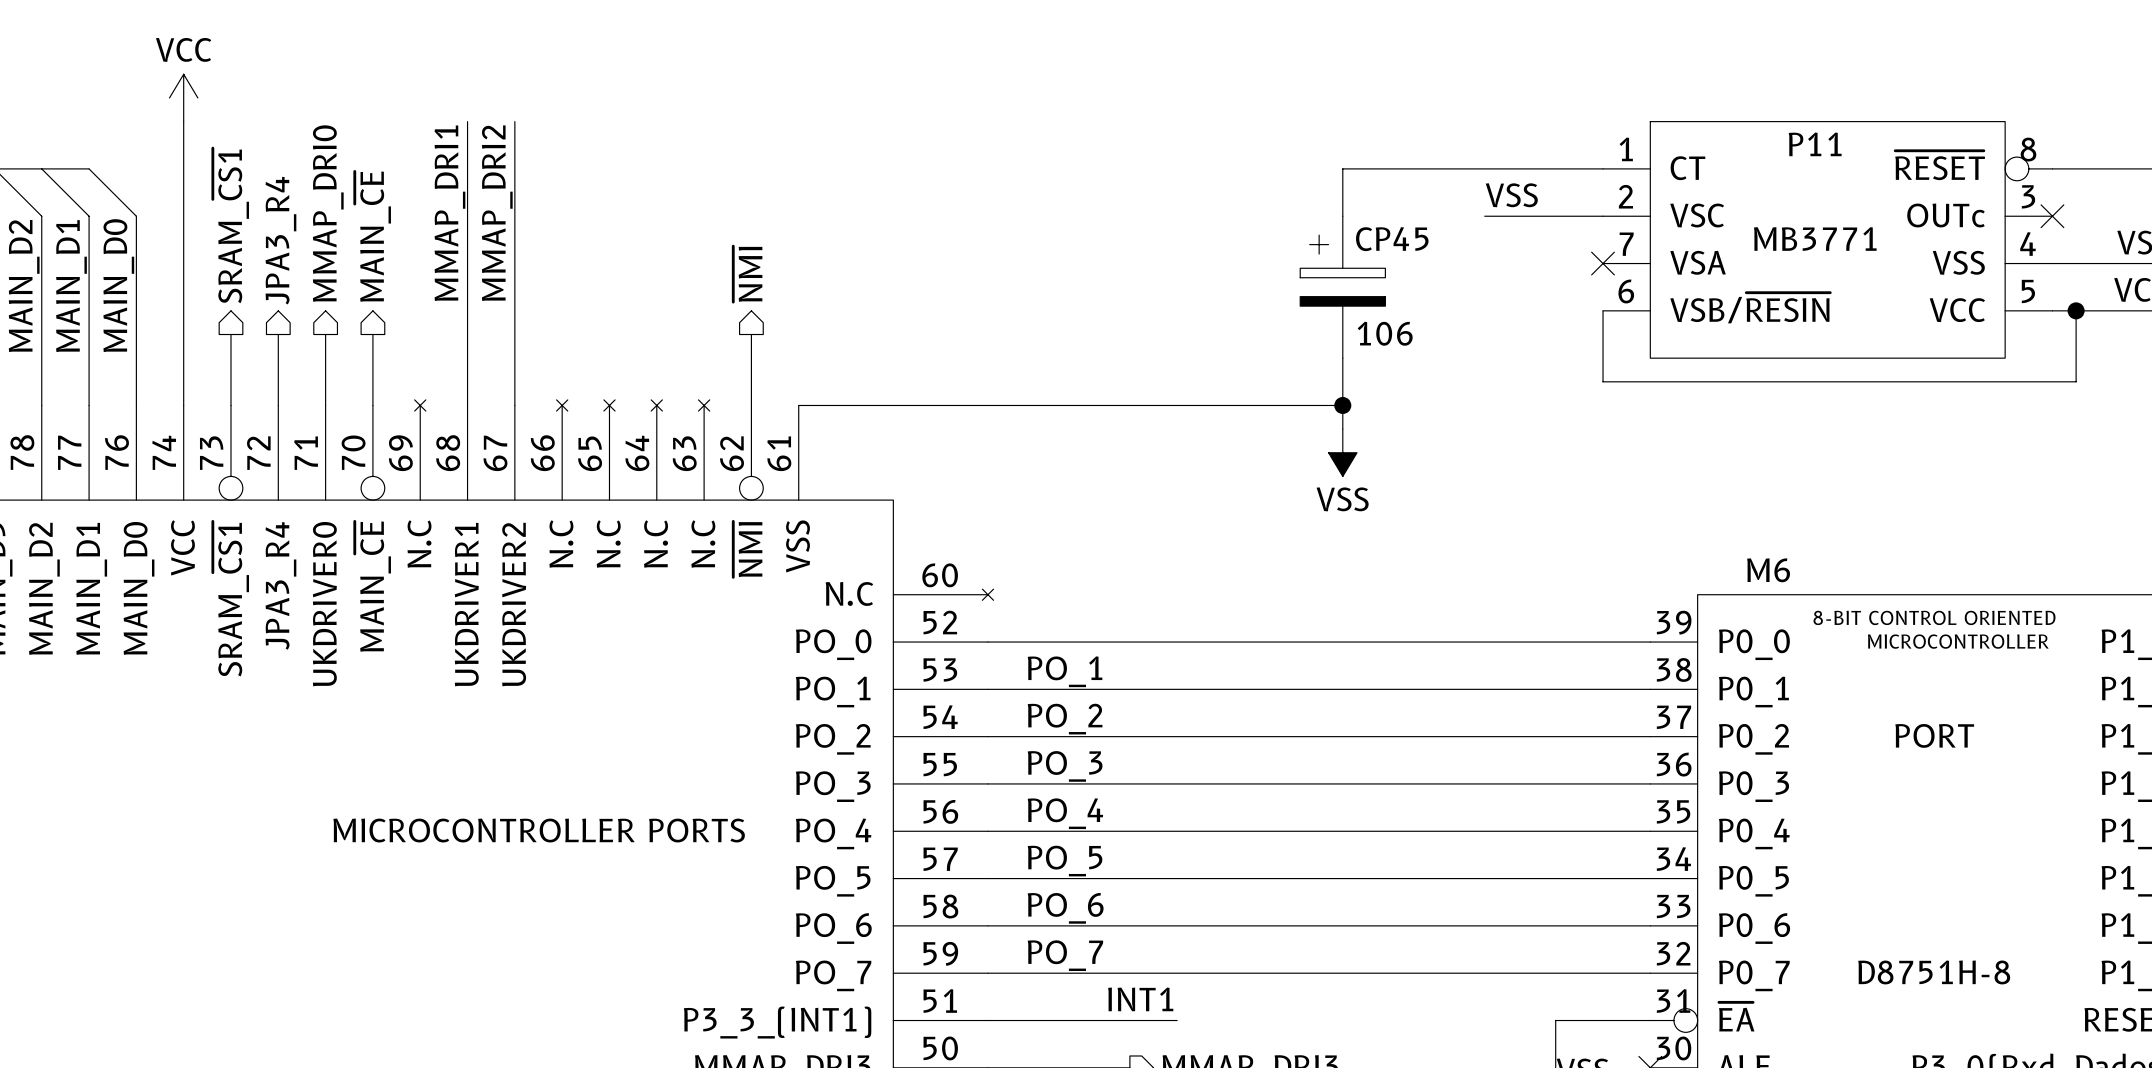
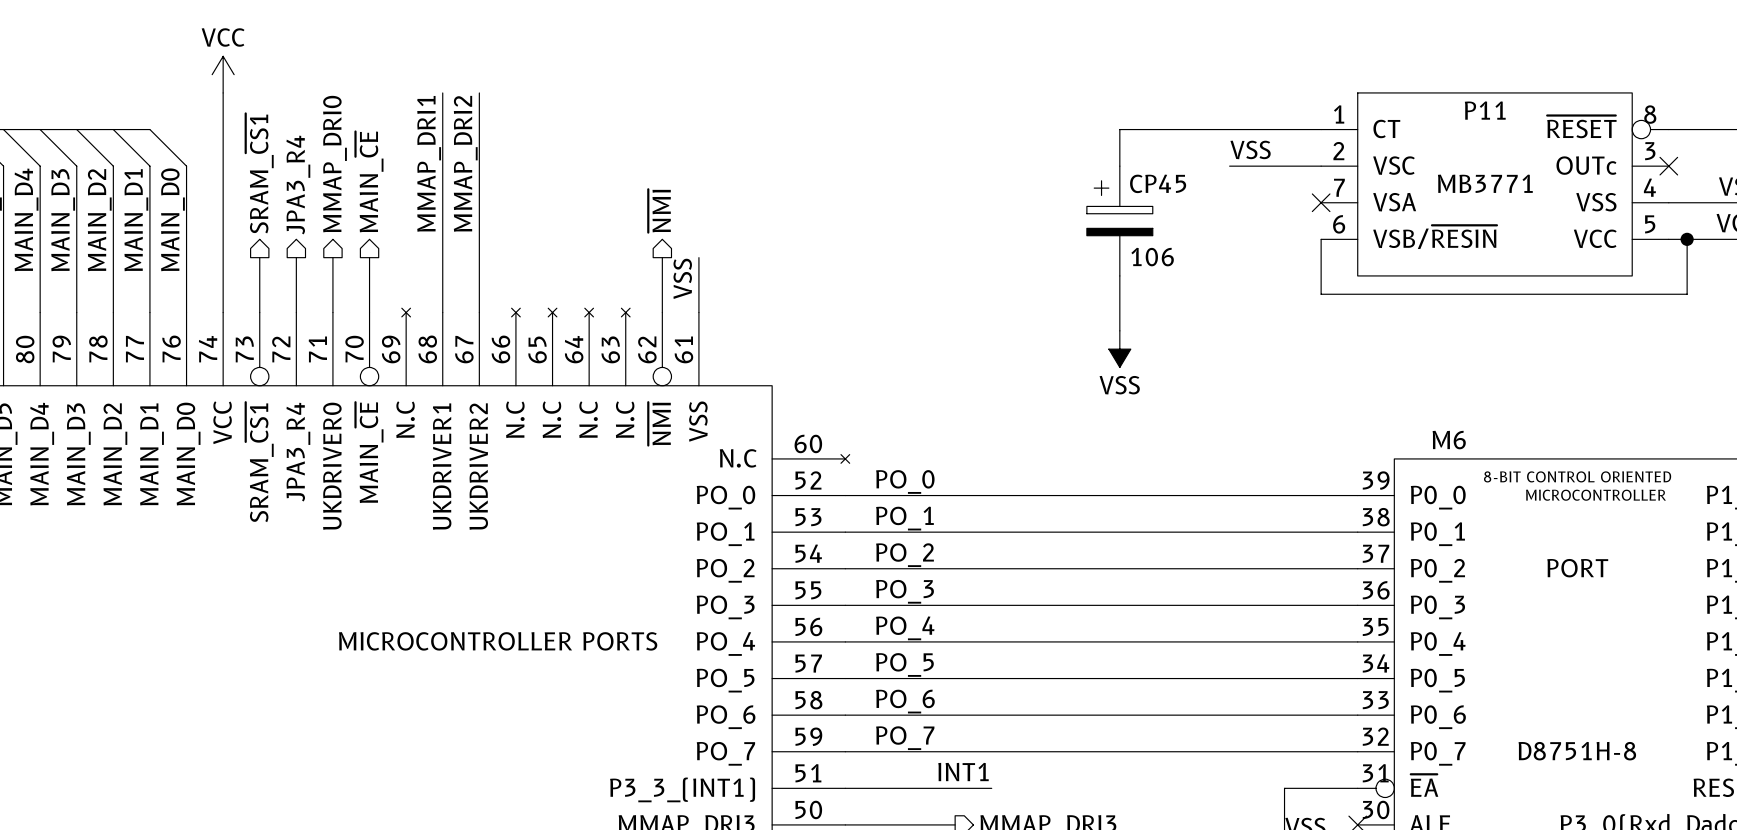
label: none -> VSS (682, 278)
wire: (798, 405) (1342, 405) -> (698, 312) (698, 257)
junction: (1342, 405) -> none
label: none -> PO_0 (905, 481)

